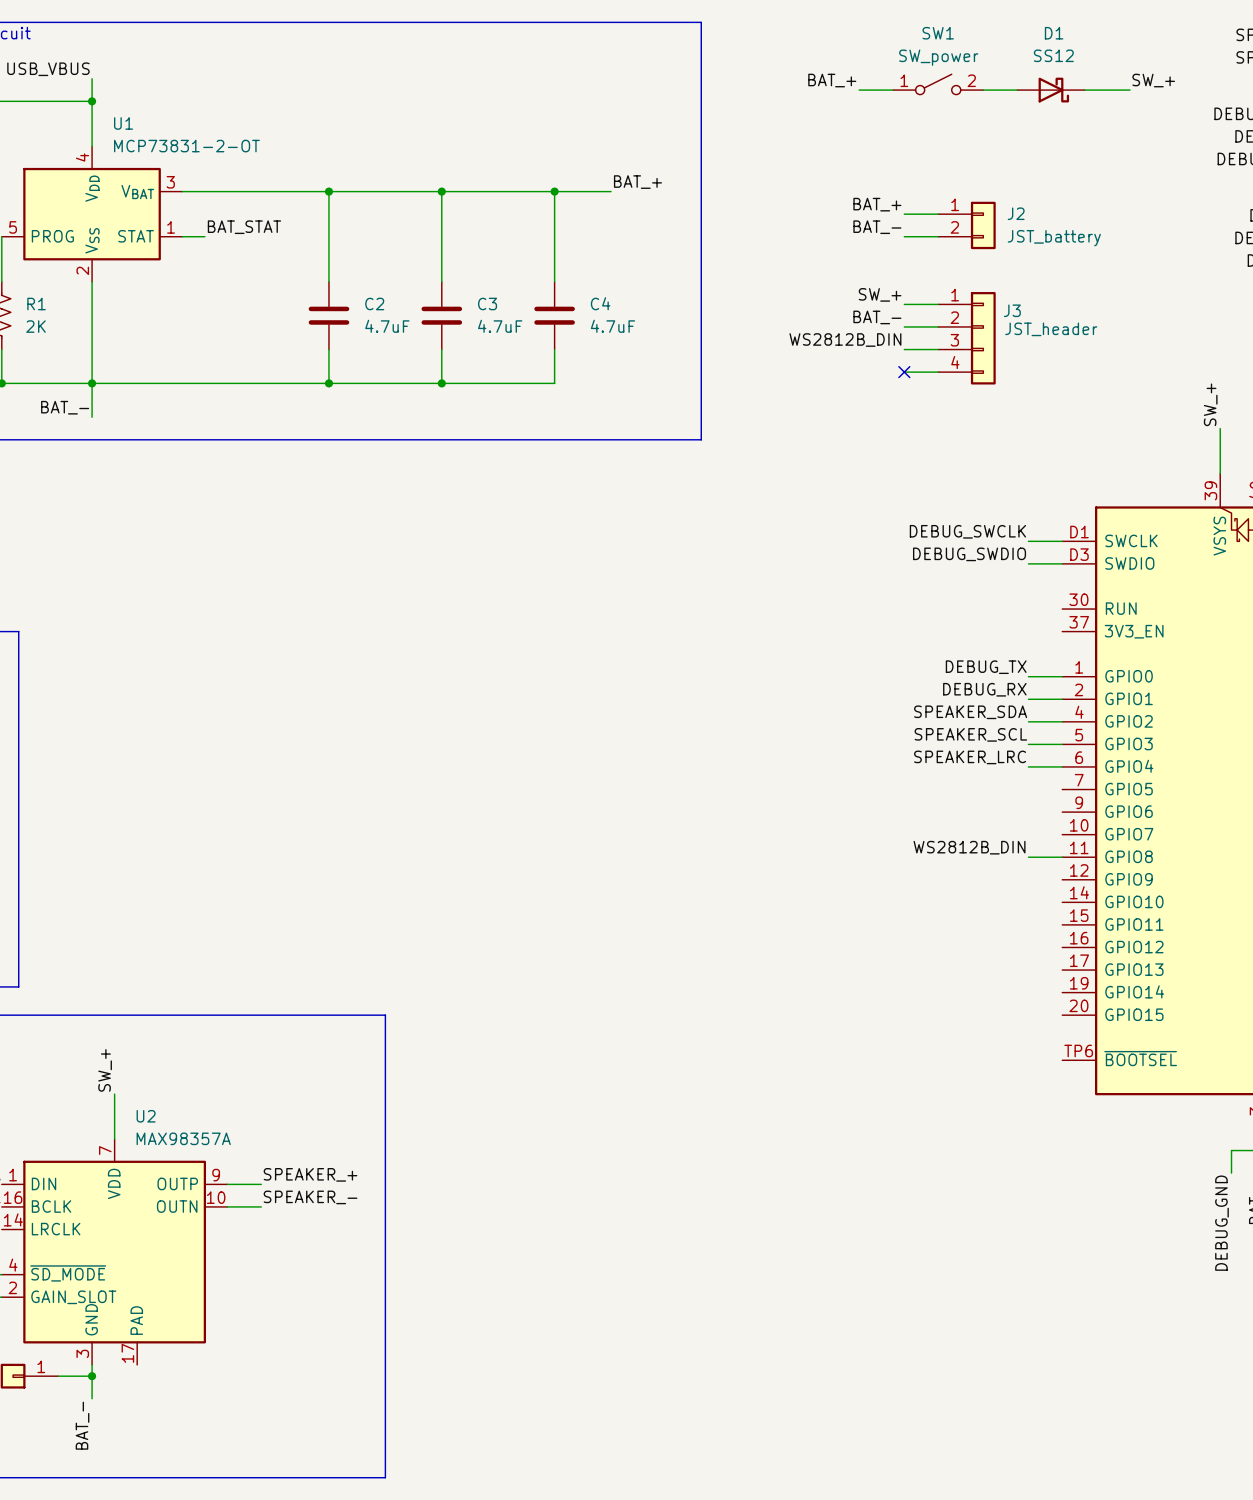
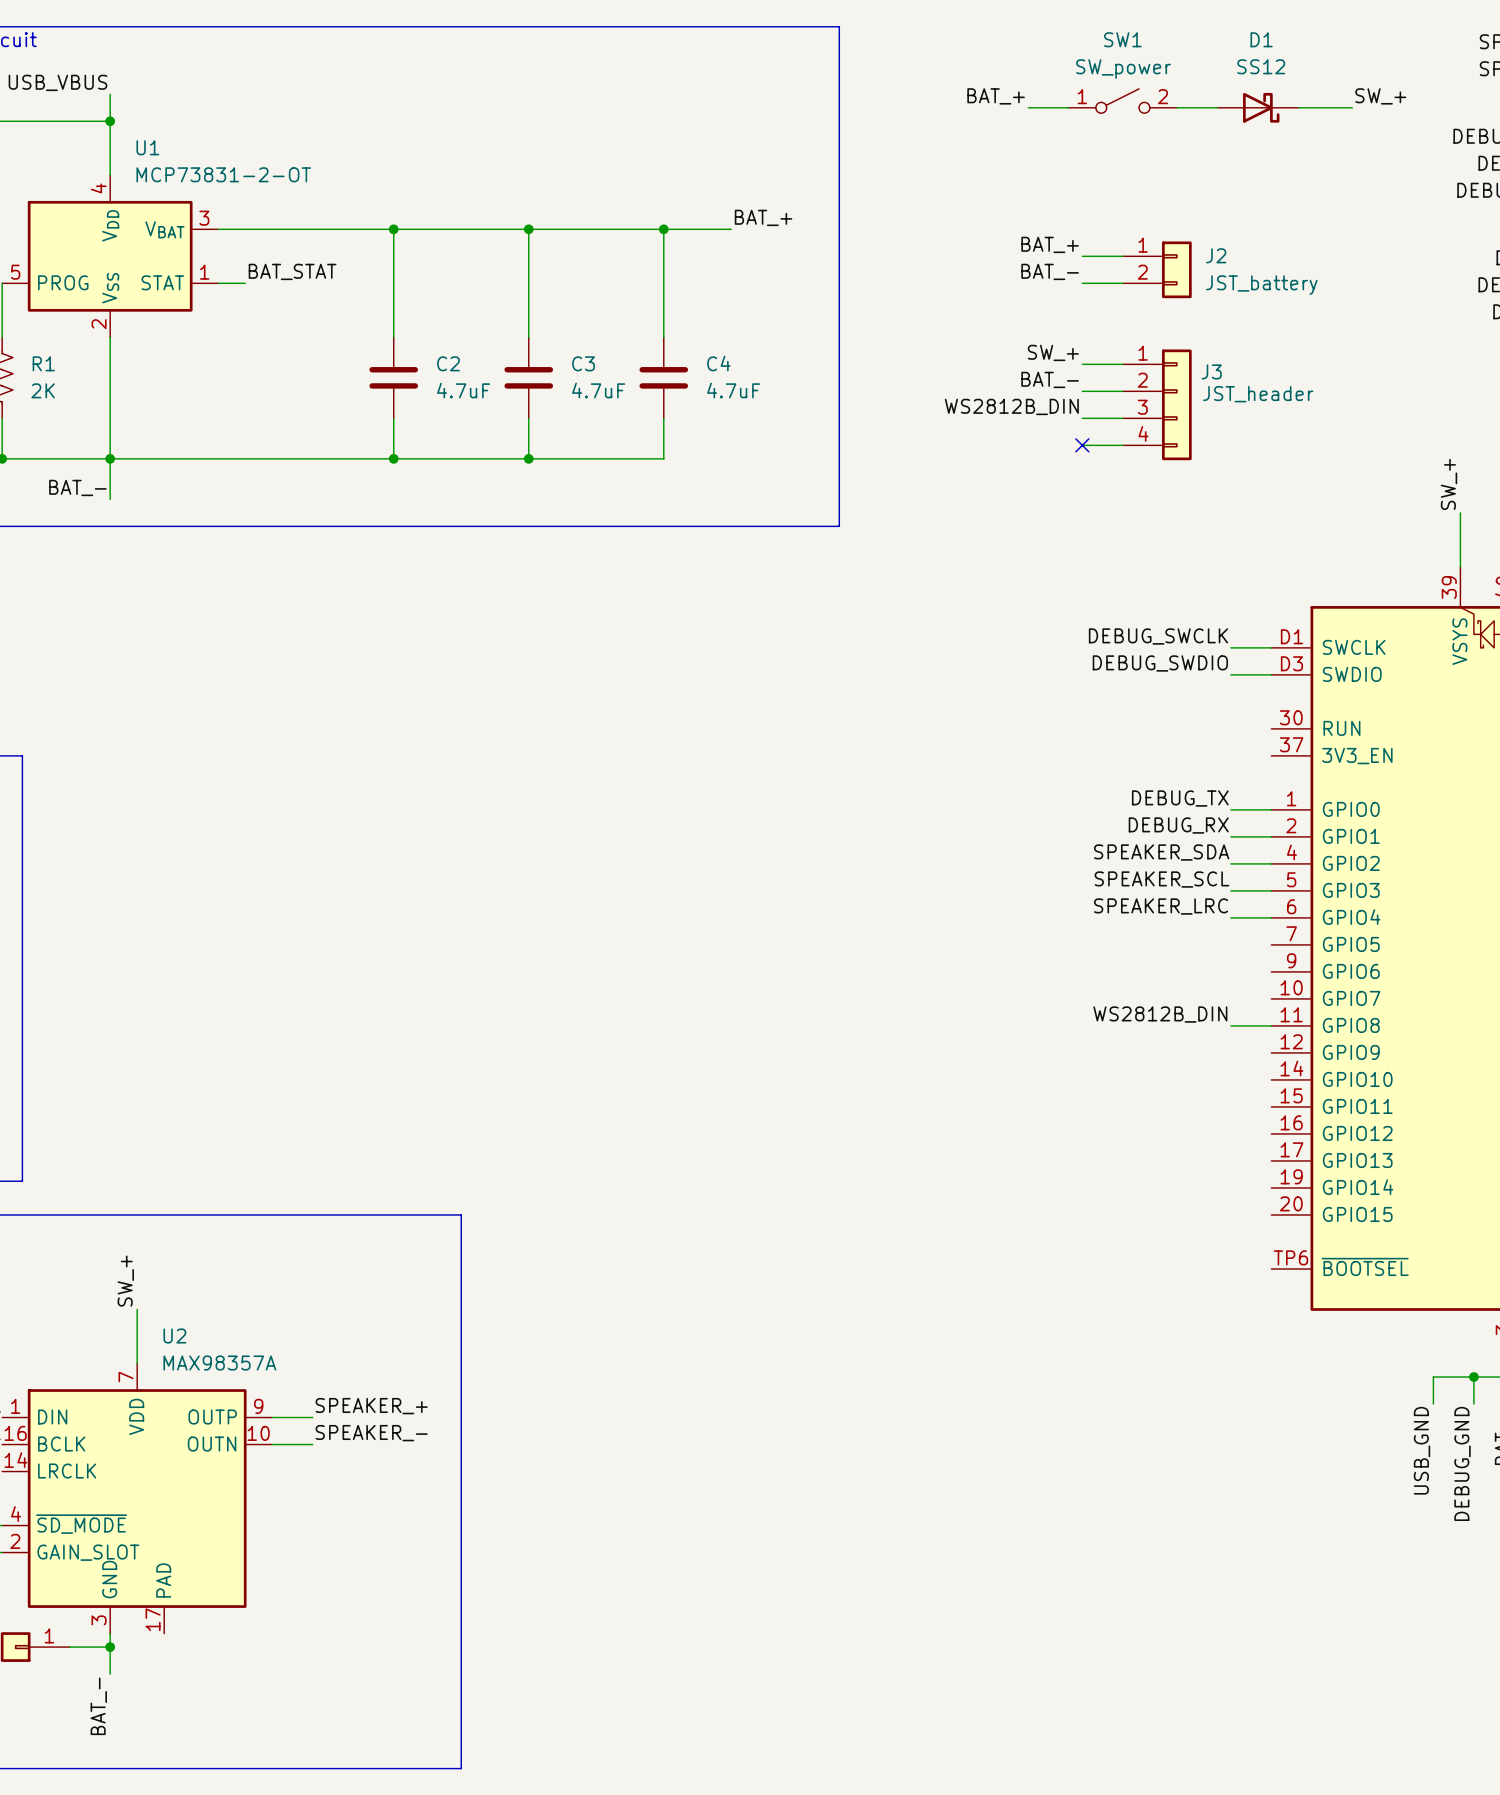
wire: none -> (1473, 1377) (1433, 1377) (1433, 1404)
junction: none -> (1473, 1377)
label: none -> USB_GND (1422, 1450)

